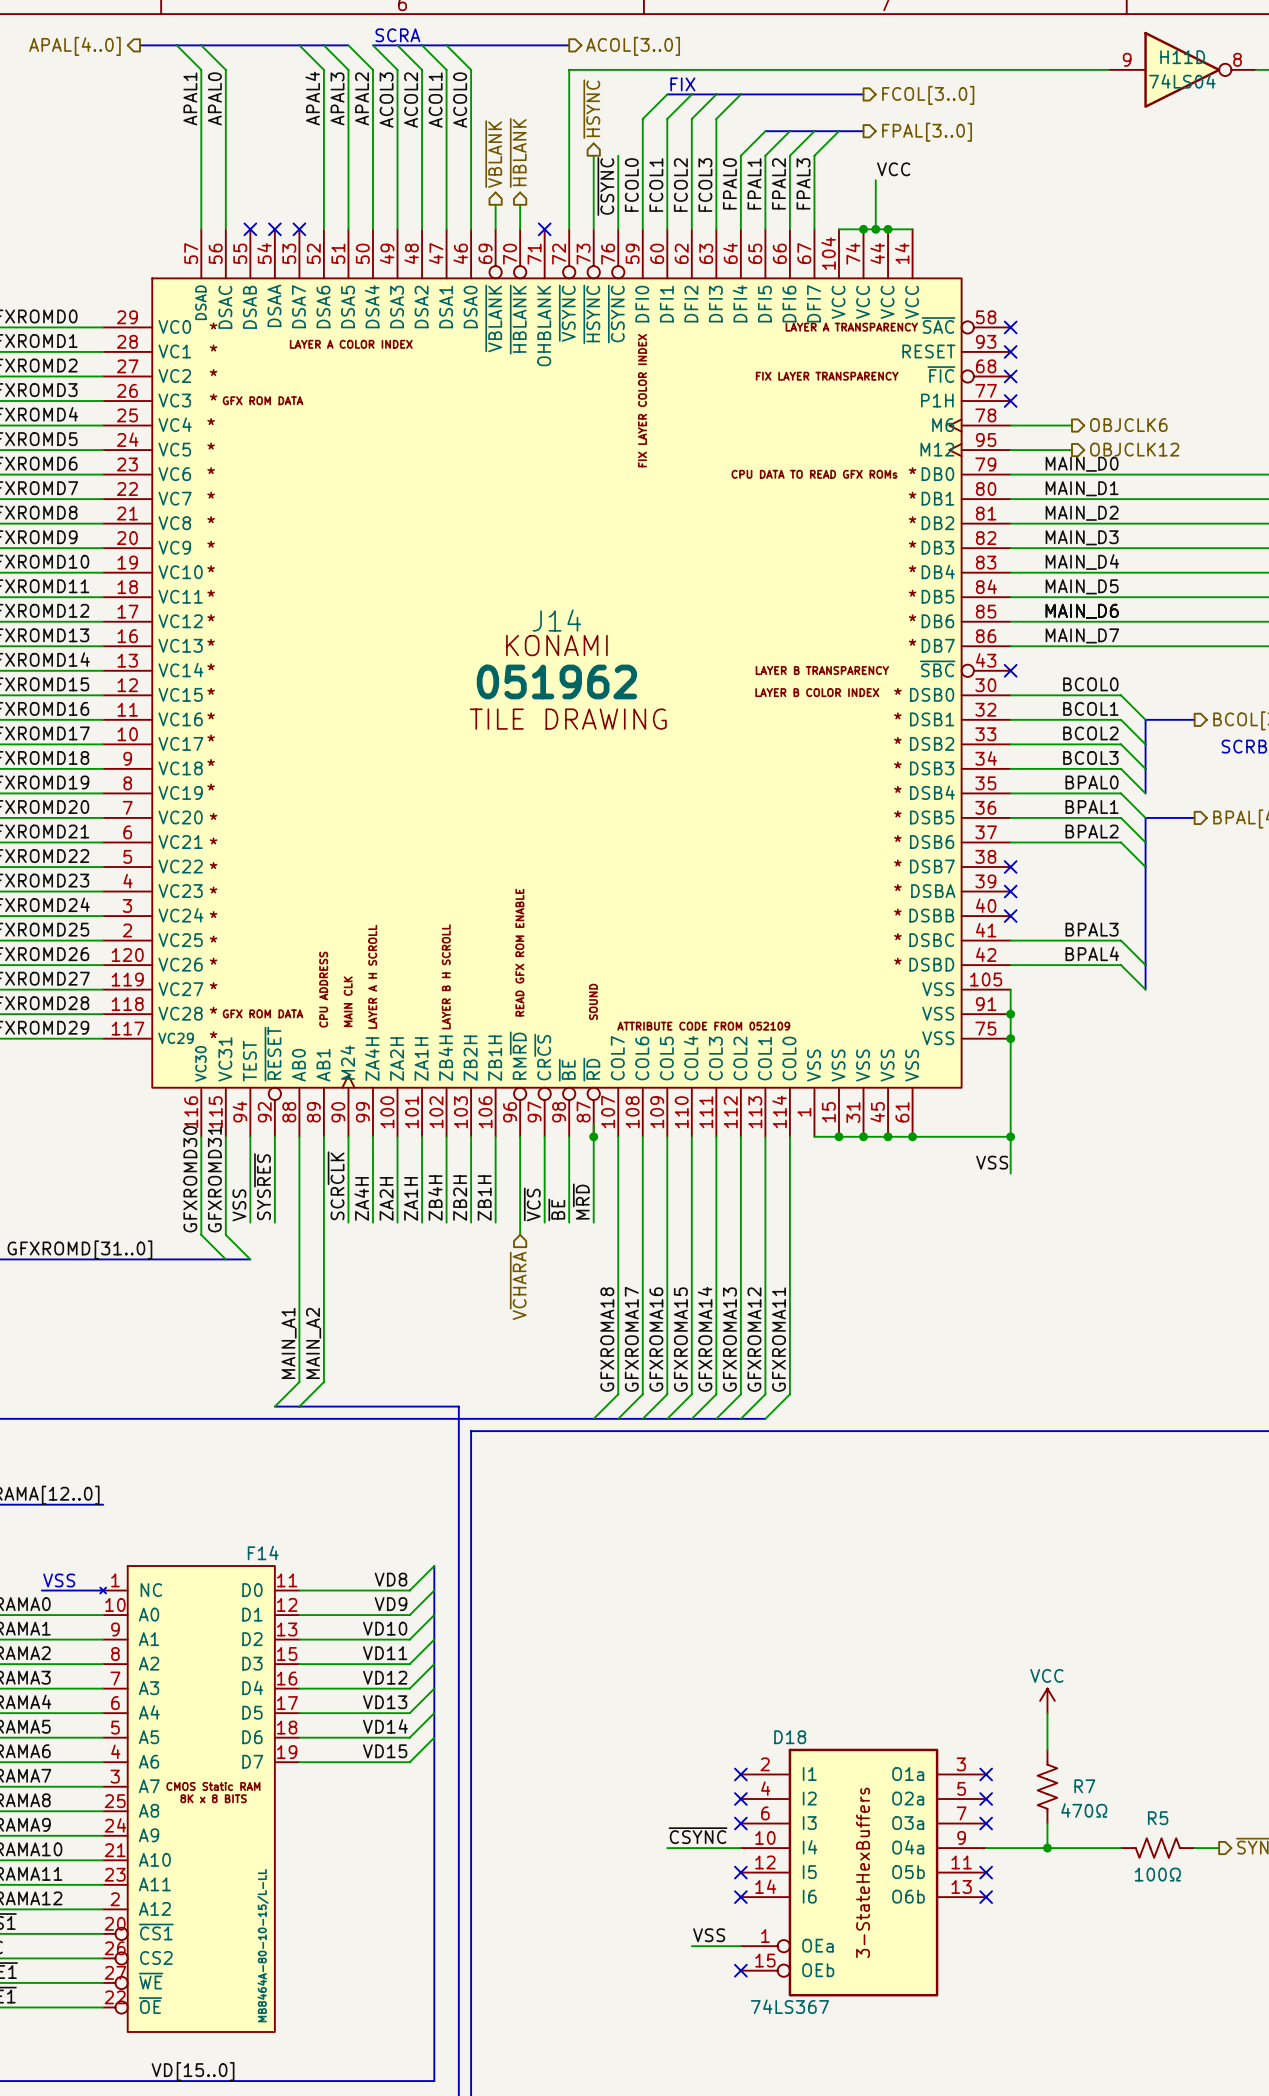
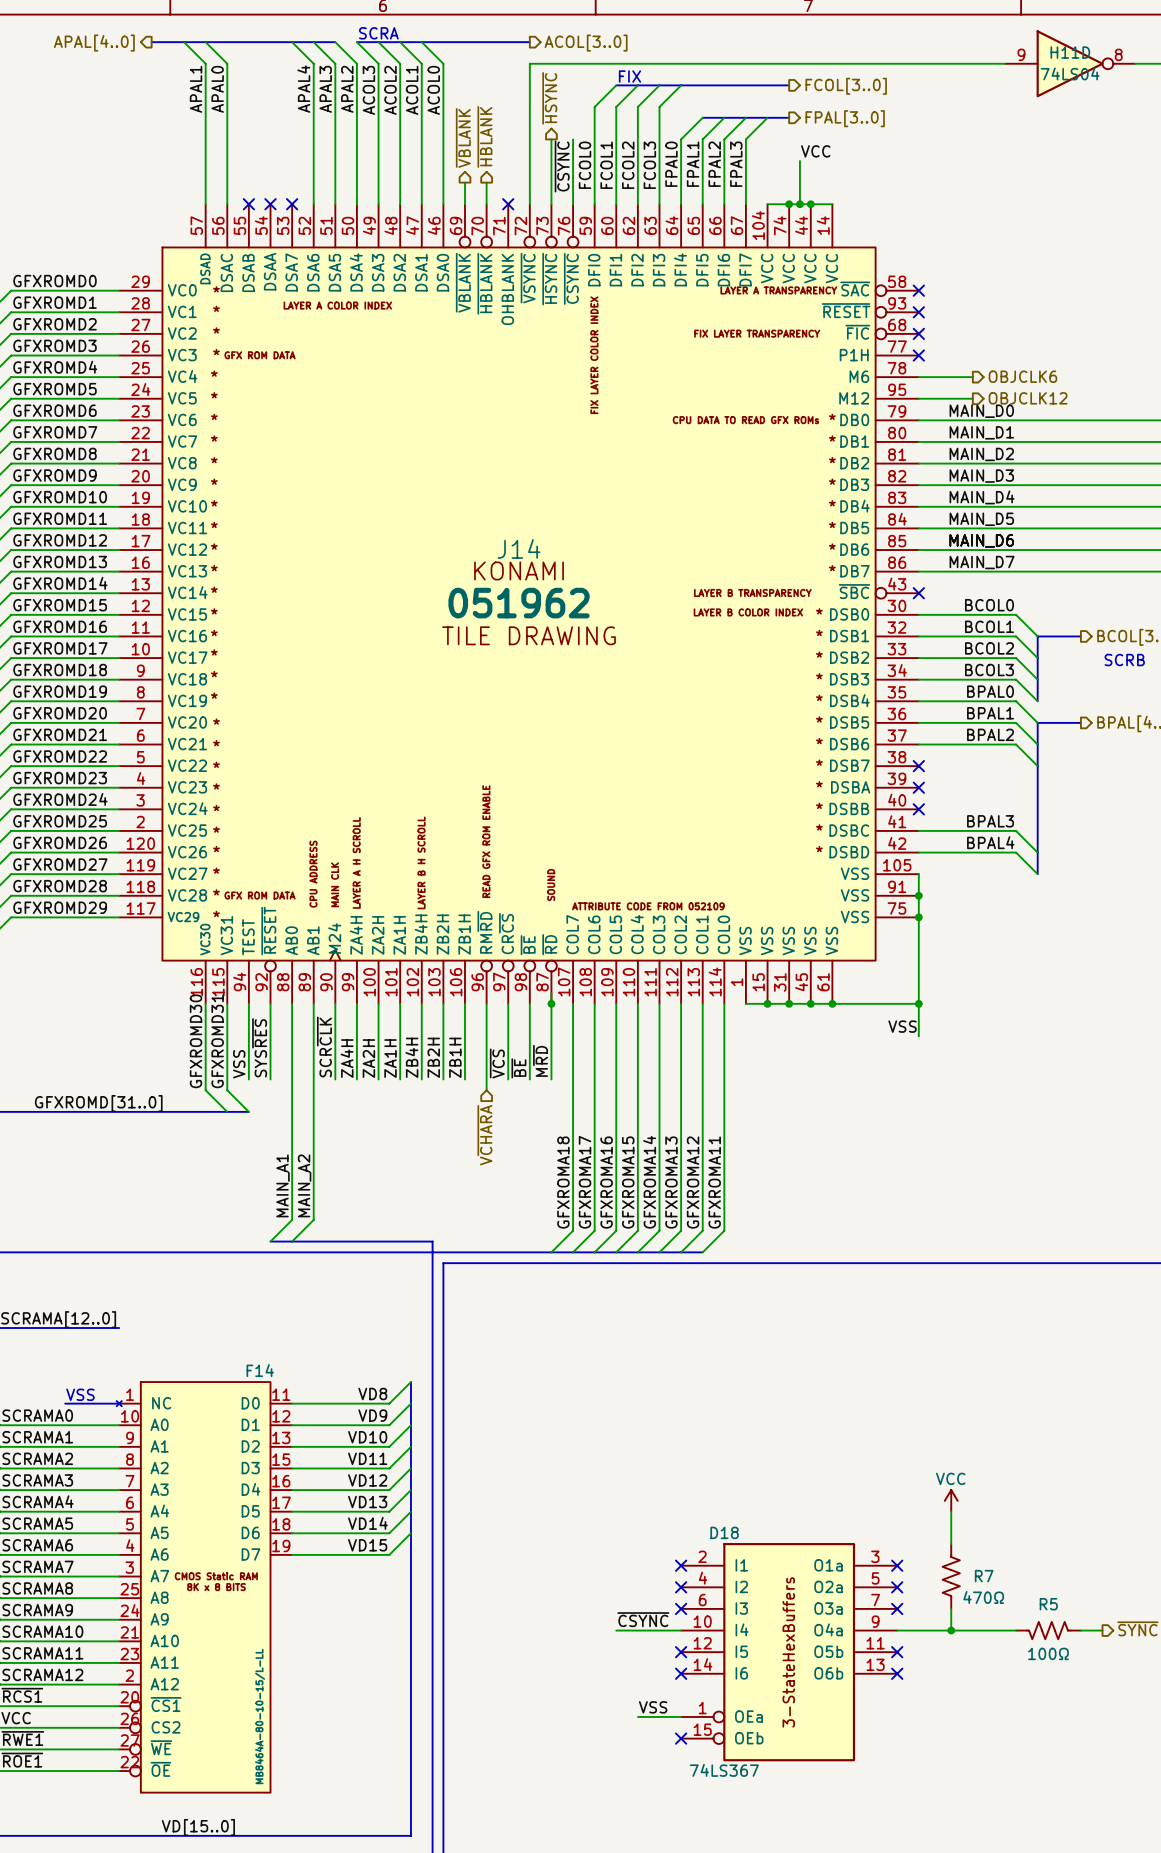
J14 symbol: [103, 229, 1011, 1137] -> [119, 204, 919, 1004]

